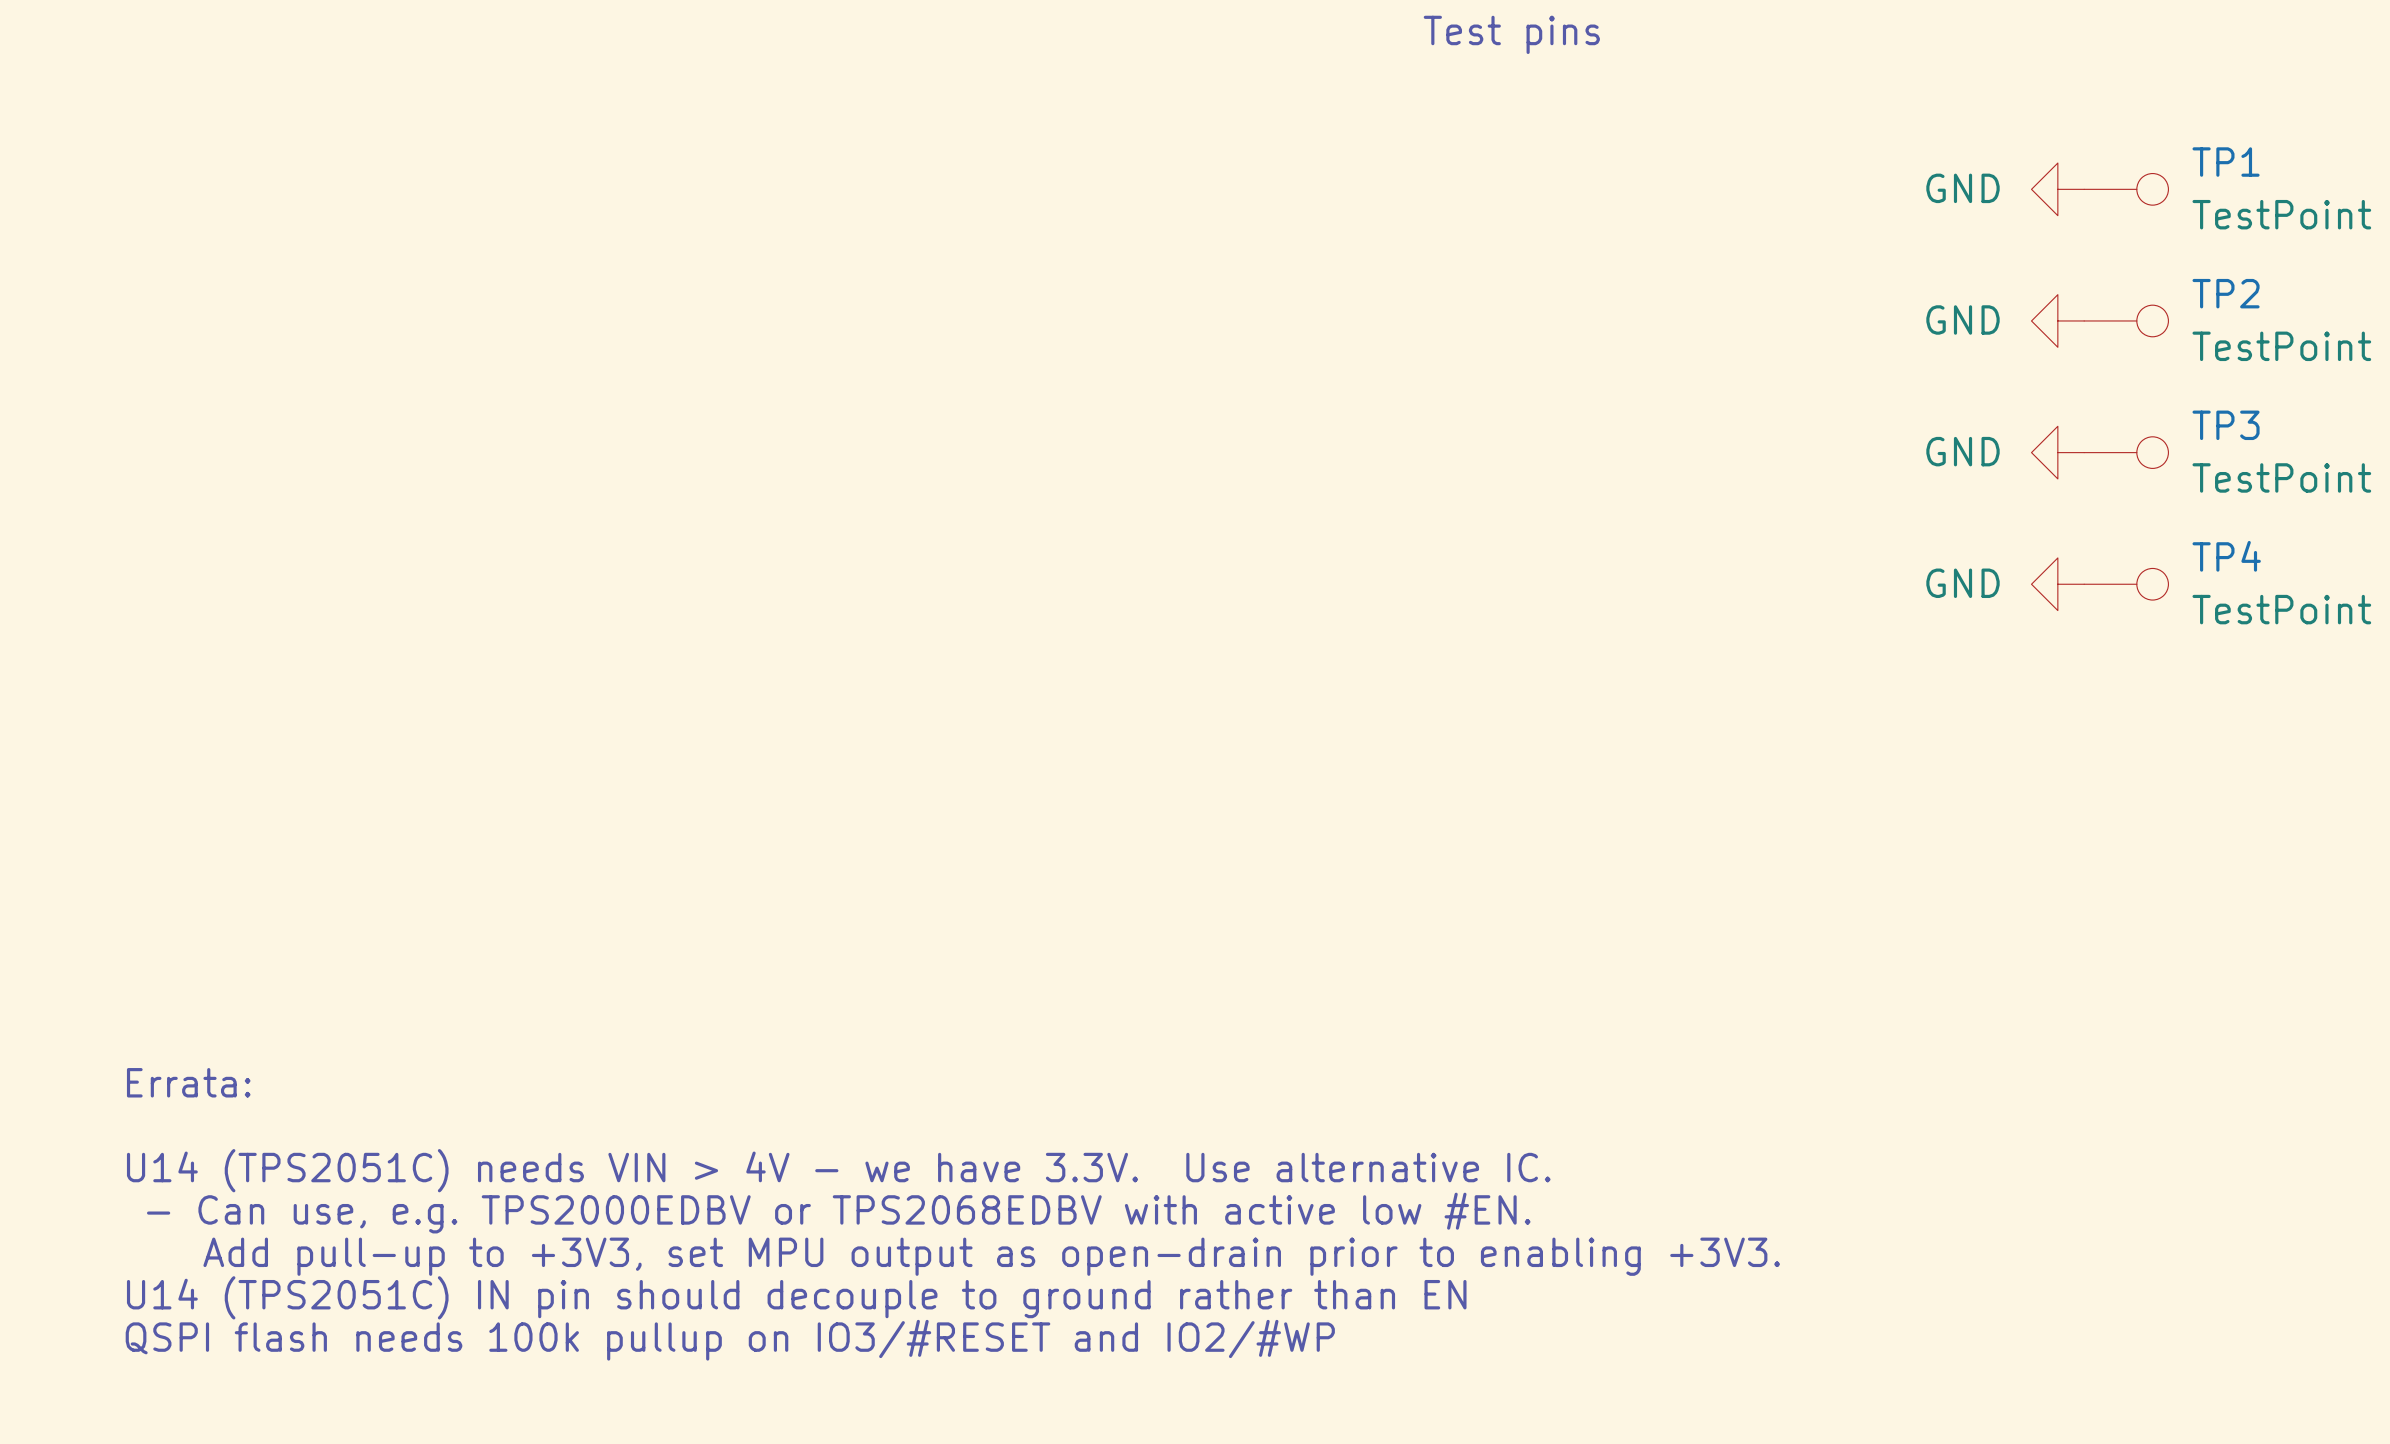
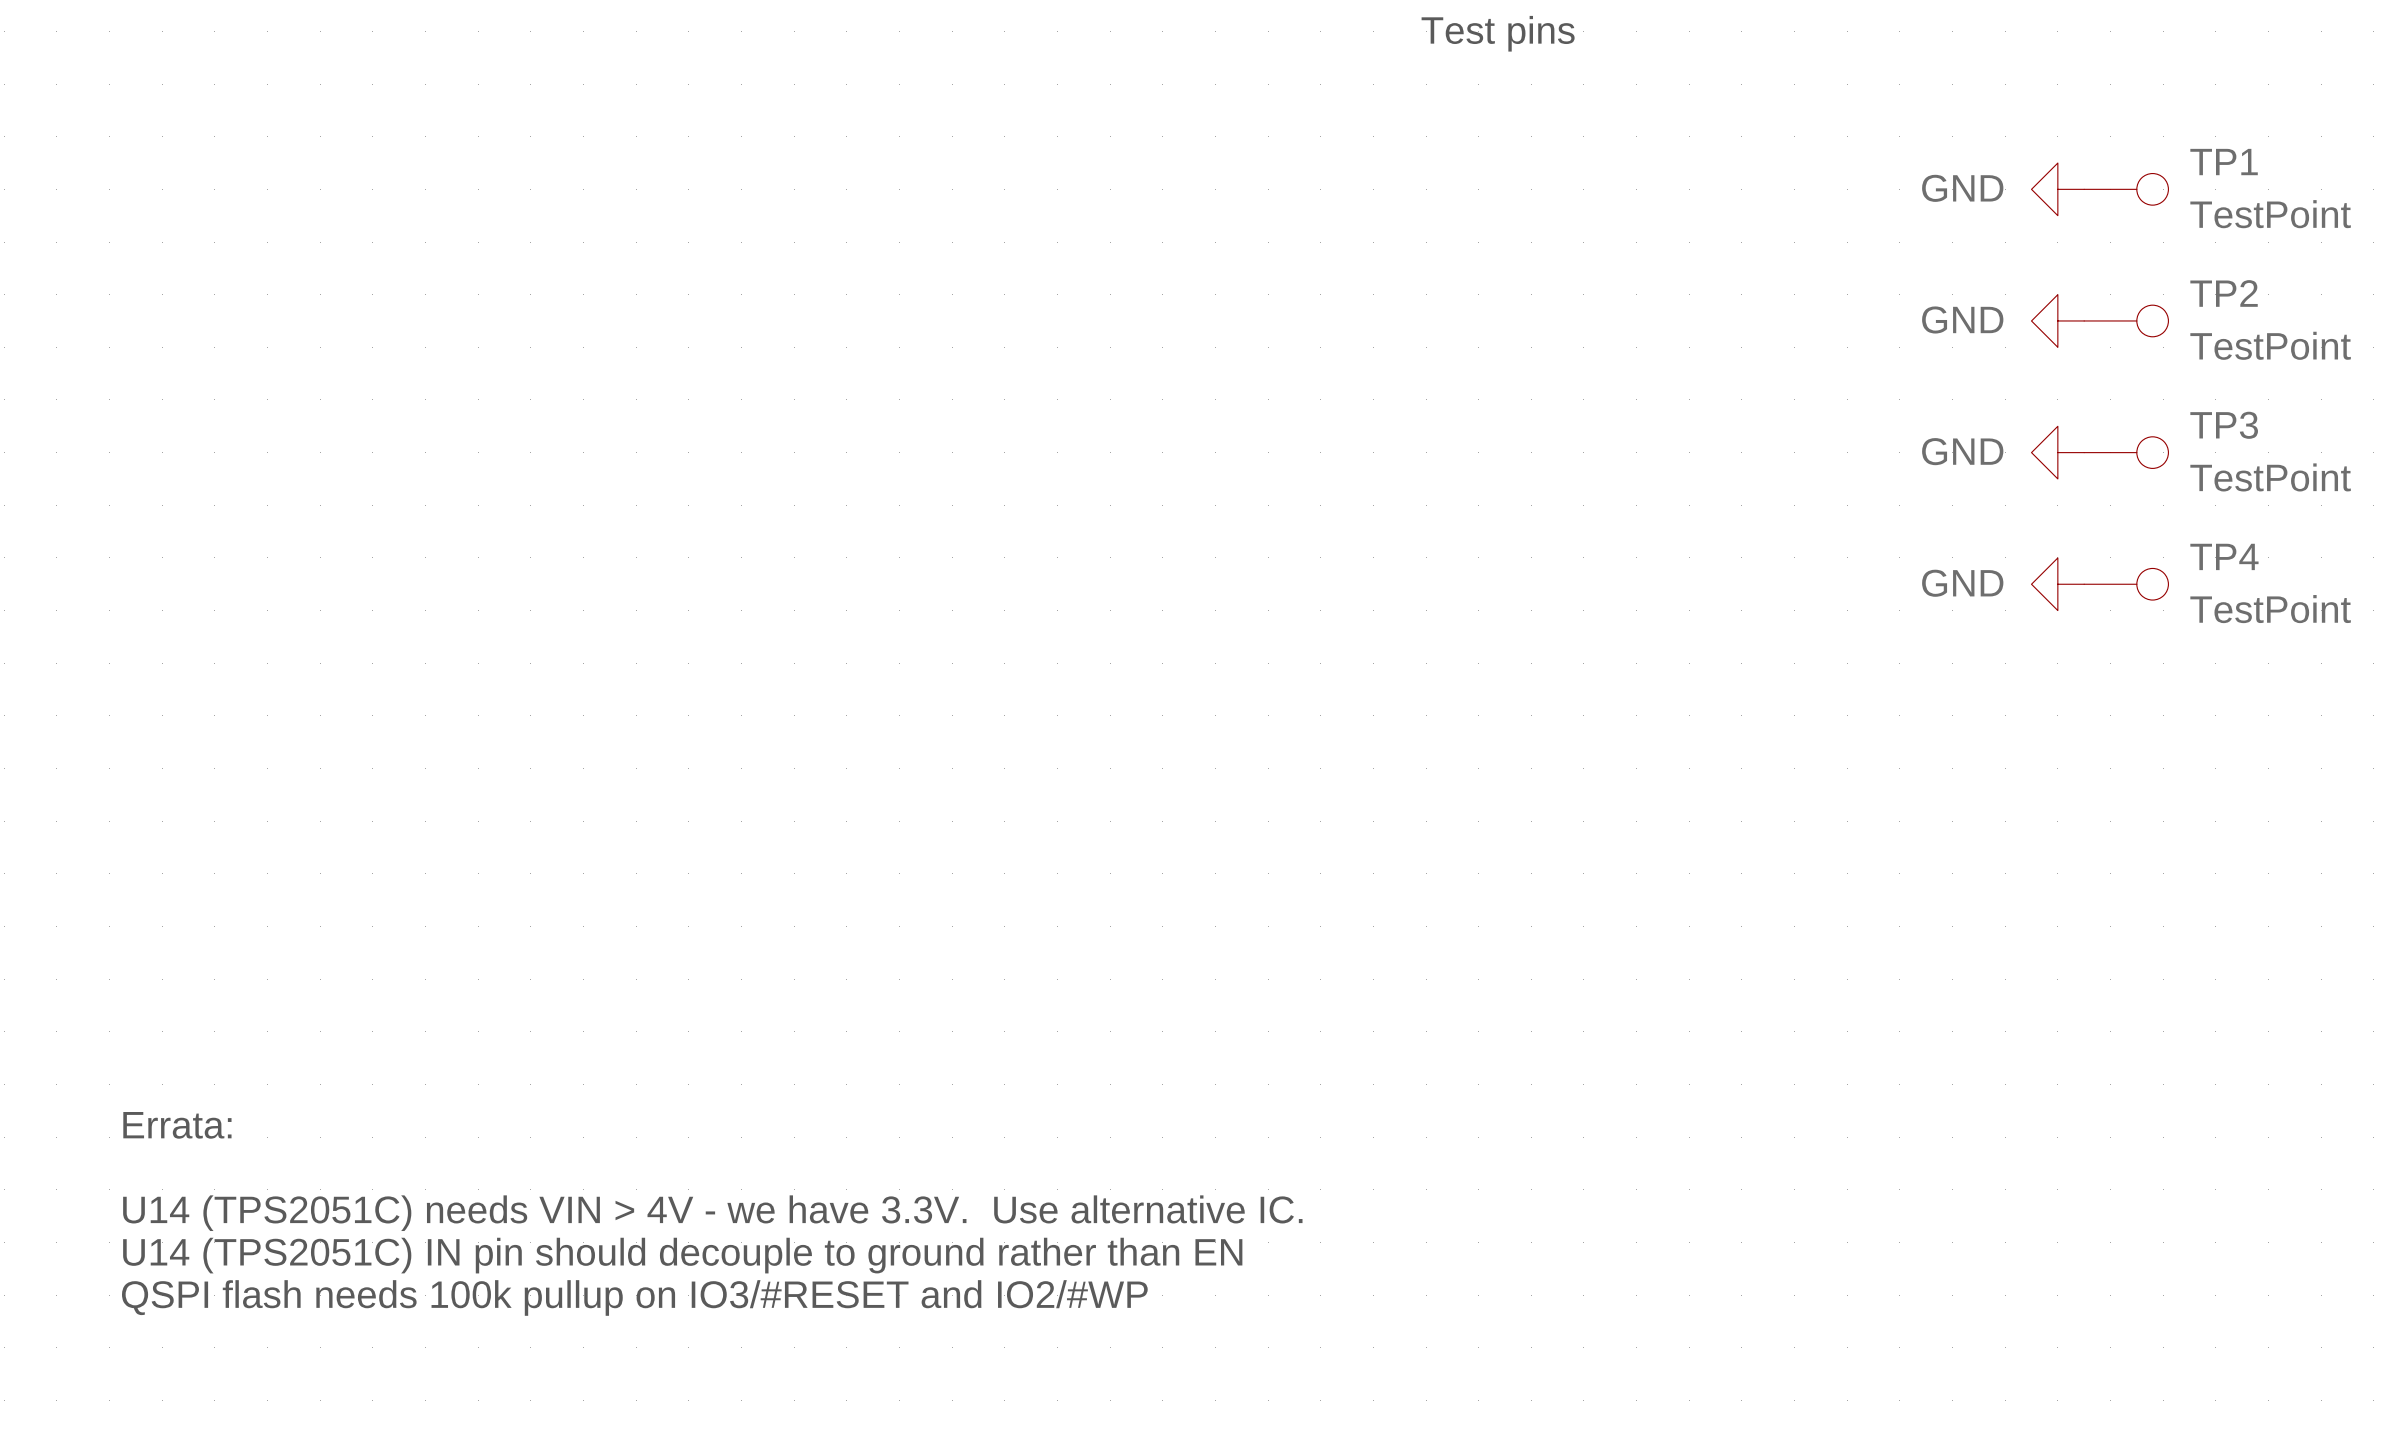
text position: Errata: (188, 1082) -> Errata: (177, 1125)
text: U14 (TPS2051C) needs VIN > 4V - we have 3.3V. Use alternative IC. (838, 1170) -> none
text: - Can use, e.g. TPS2000EDBV or TPS2068EDBV with active low #EN. (838, 1213) -> U14 (TPS2051C) needs VIN > 4V - we have 3.3V. Use alternative IC. (712, 1213)
text: Add pull-up to +3V3, set MPU output as open-drain prior to enabling +3V3. (991, 1256) -> U14 (TPS2051C) IN pin should decouple to ground rather than EN (682, 1255)
text: U14 (TPS2051C) IN pin should decouple to ground rather than EN (796, 1297) -> QSPI flash needs 100k pullup on IO3/#RESET and IO2/#WP (634, 1297)
text: QSPI flash needs 100k pullup on IO3/#RESET and IO2/#WP (730, 1340) -> none

